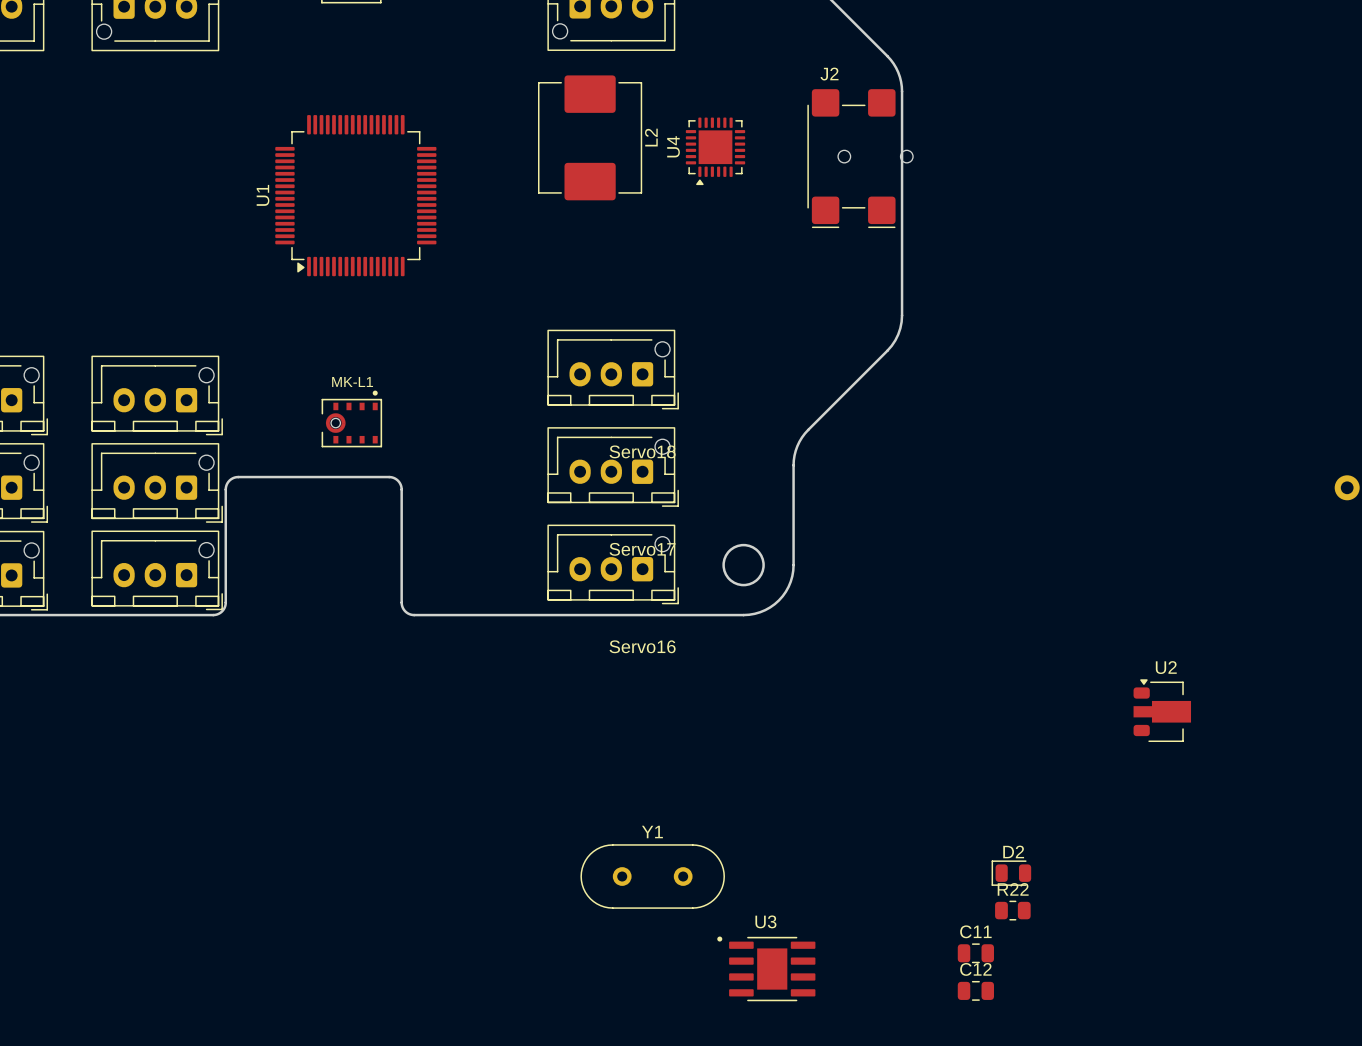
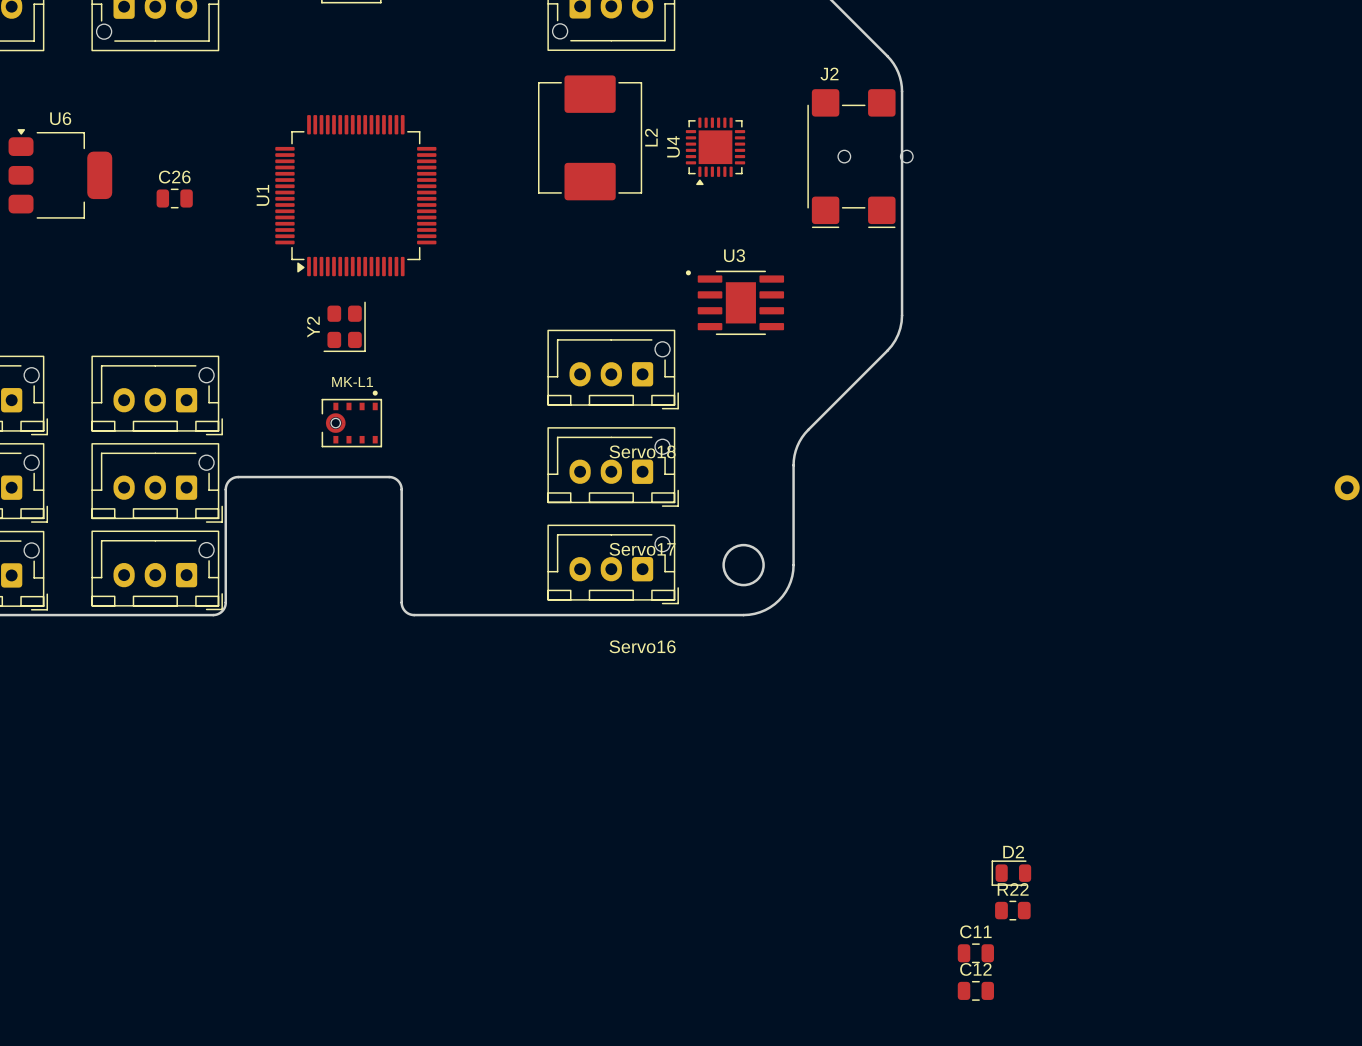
U6: none -> (60, 173)
C26: none -> (174, 198)
Y2: none -> (344, 326)
U2: (1162, 710) -> none
Y1: (652, 876) -> none
U3 position: (766, 968) -> (734, 302)

